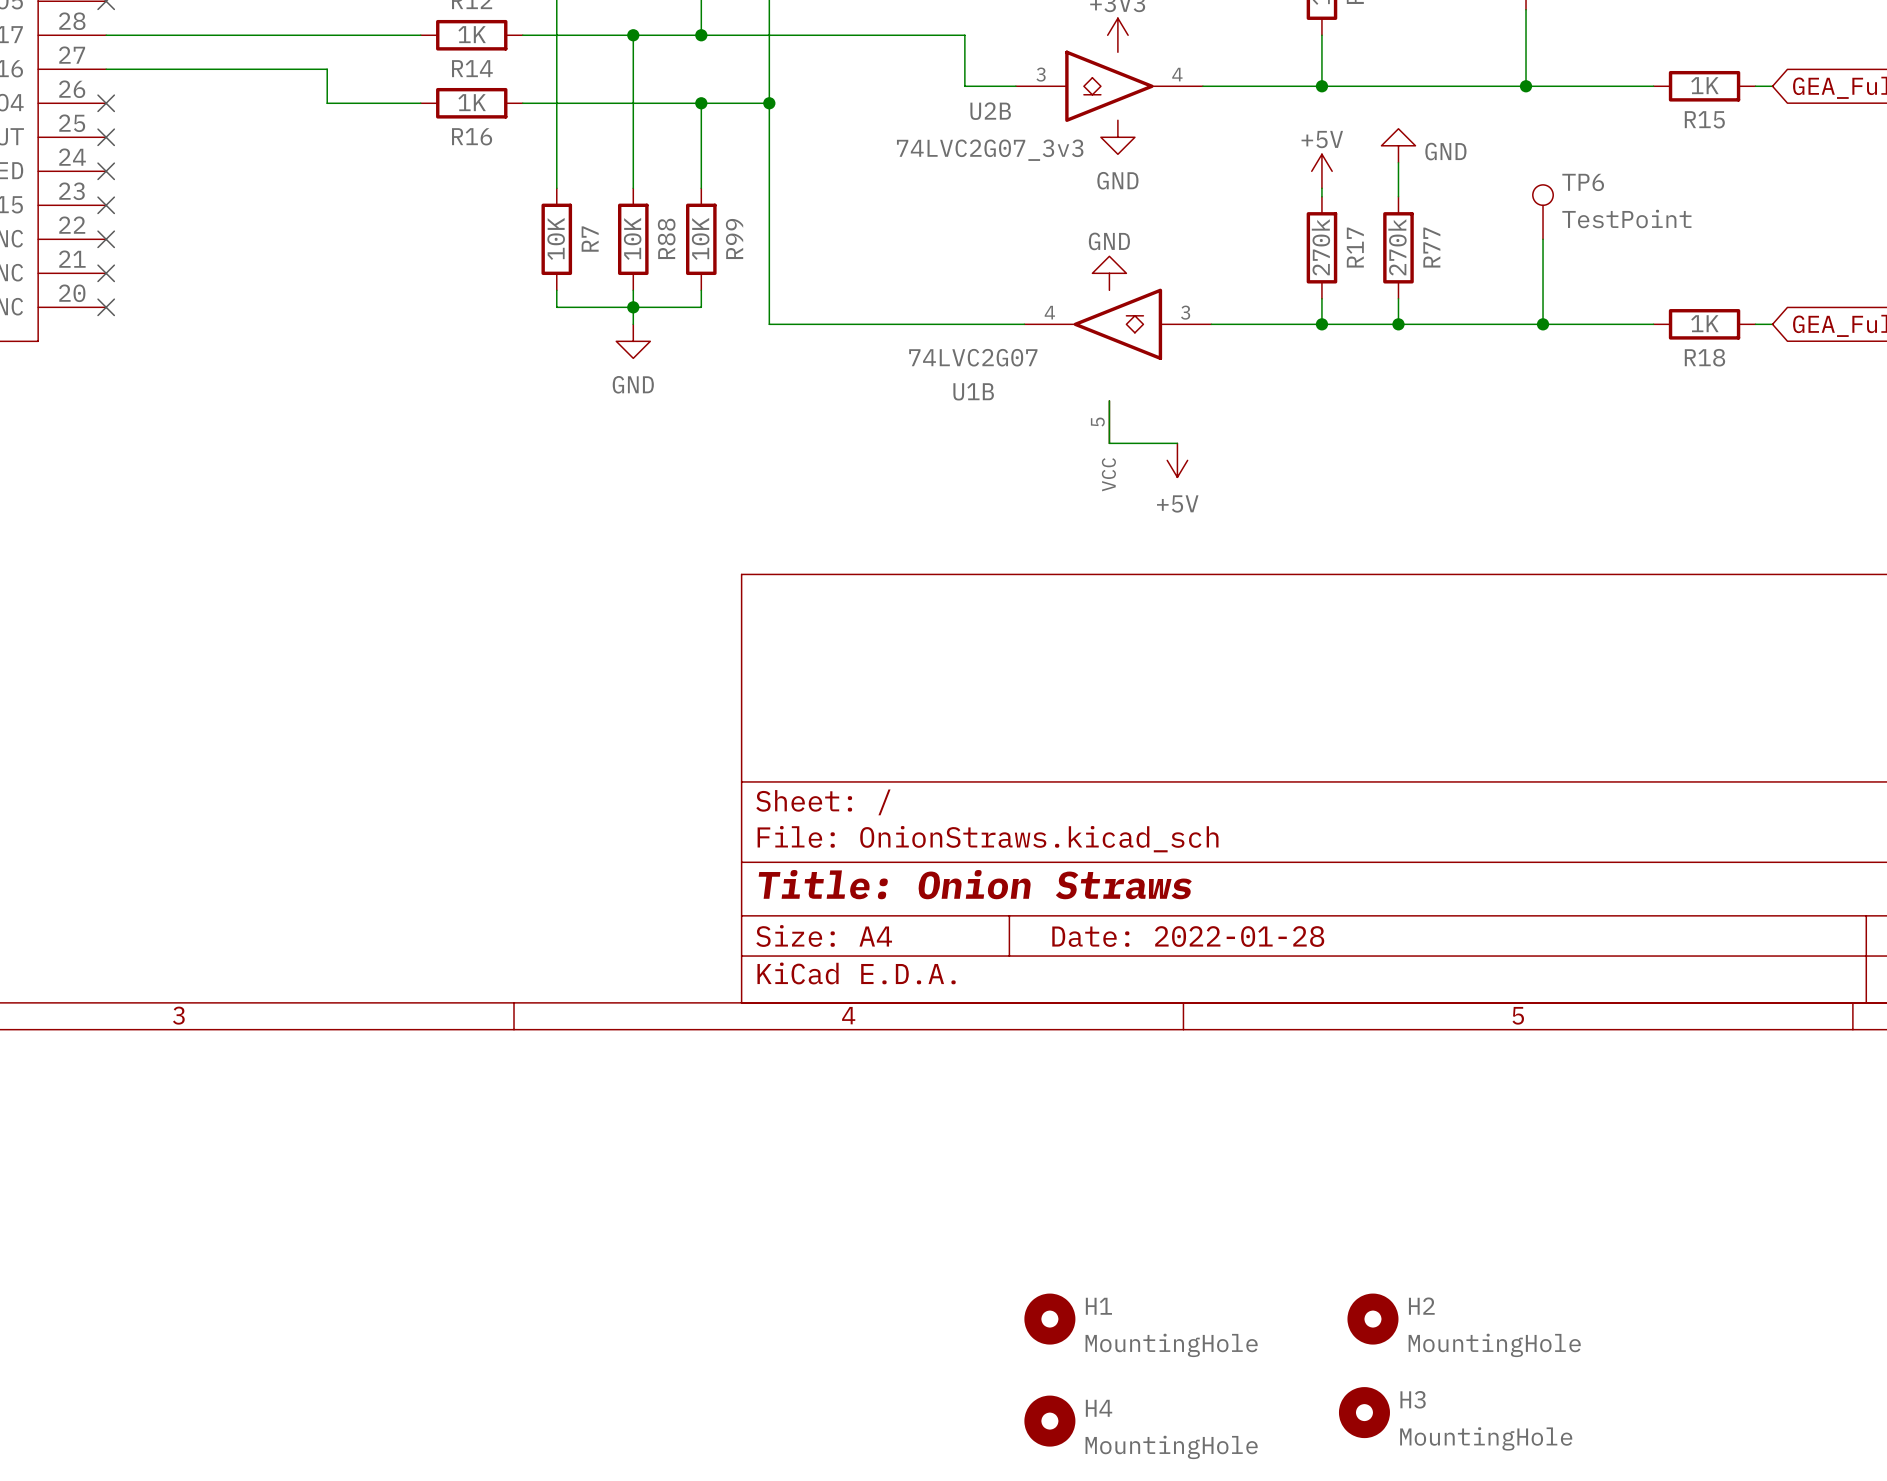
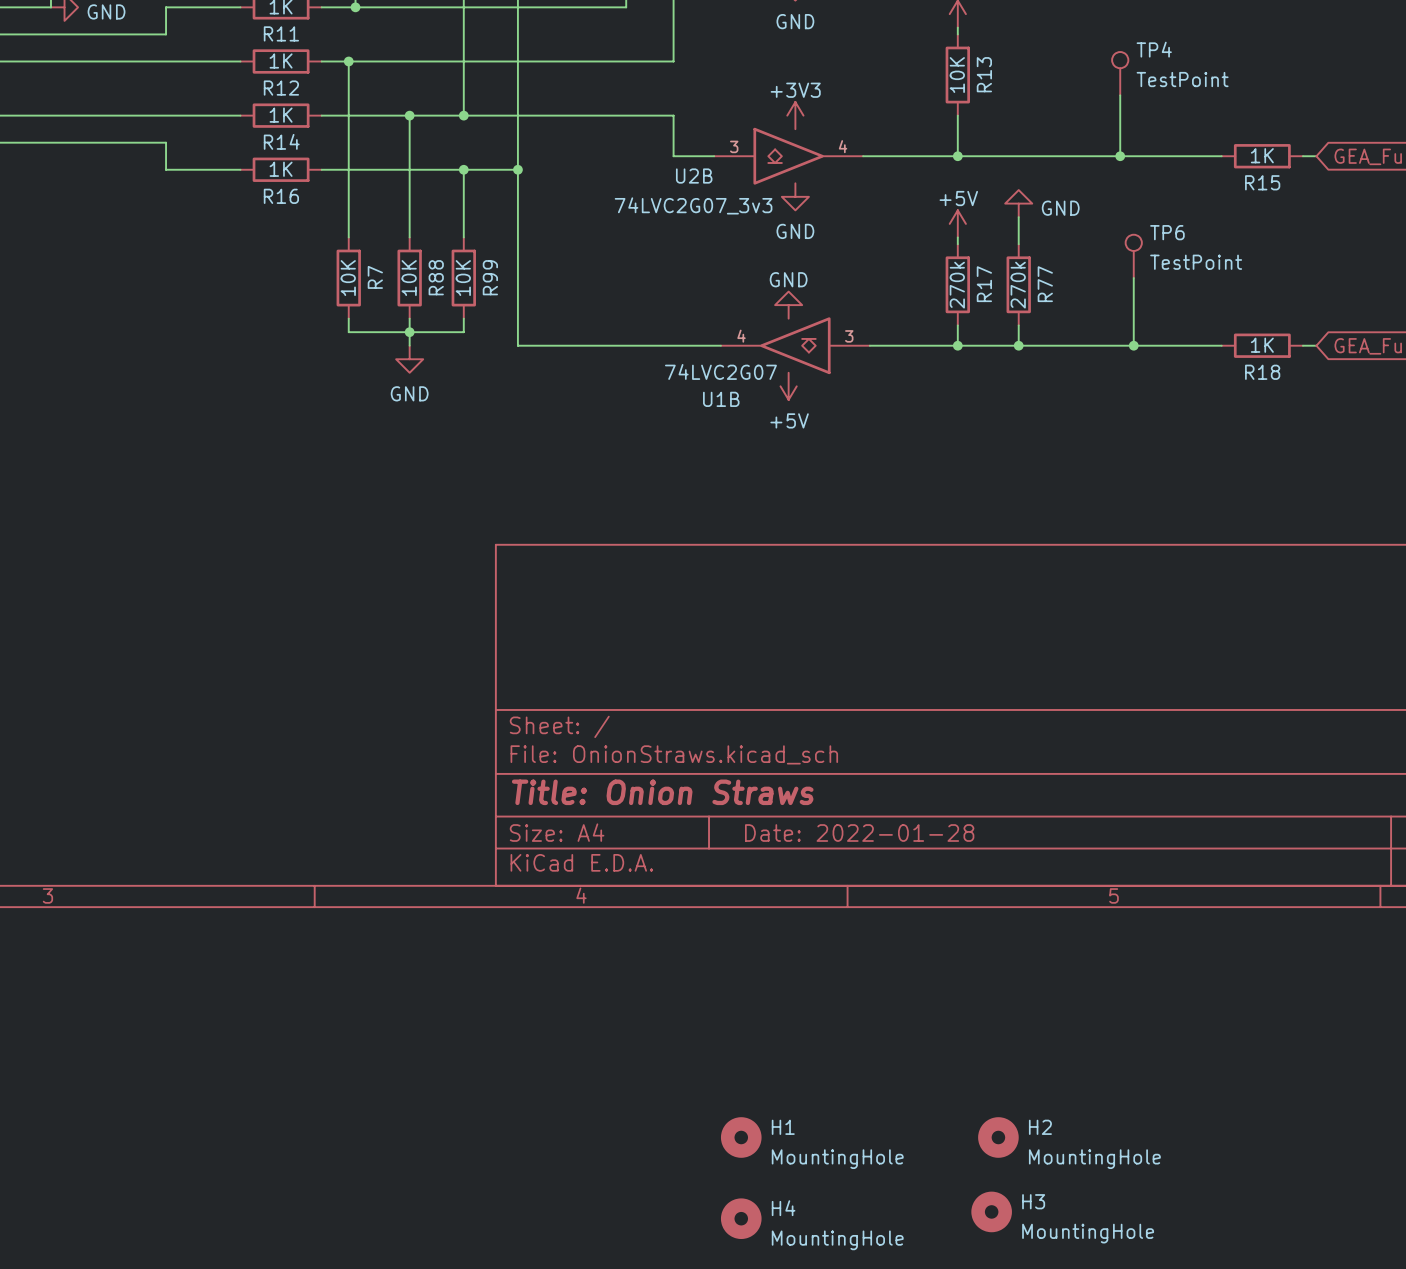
U1B symbol: [1024, 288, 1212, 444] -> [720, 317, 870, 375]
U1B value position: 74LVC2G07 (973, 357) -> 74LVC2G07 (720, 371)
U1B name position: U1B (973, 391) -> U1B (721, 399)
wire: (1109, 400) (1109, 443) (1177, 443) -> none
power symbol position: +5V (1177, 460) -> +5V (788, 386)

